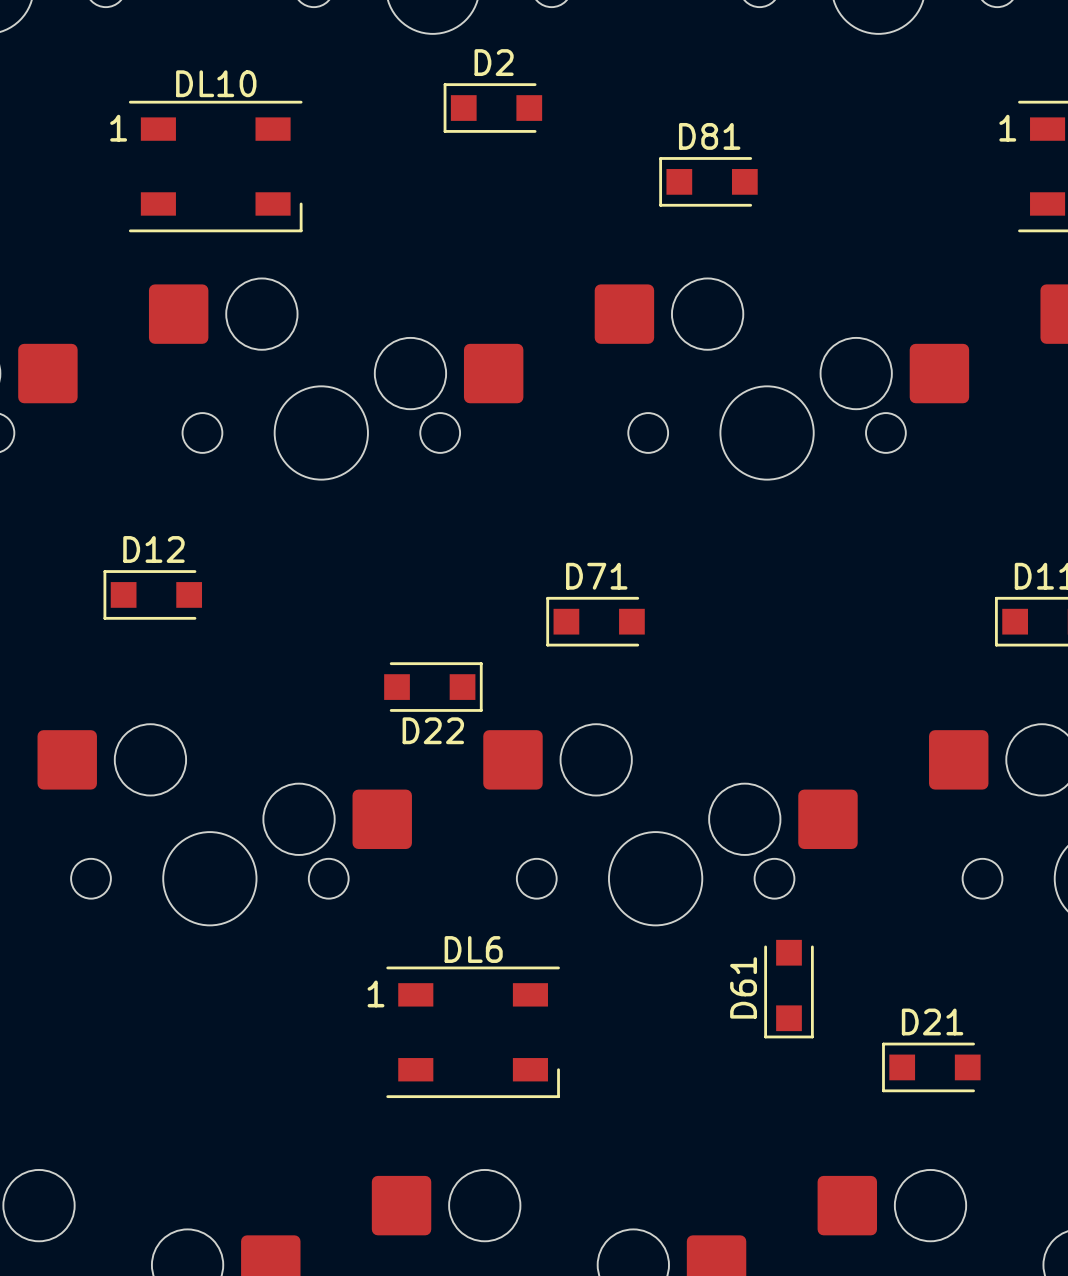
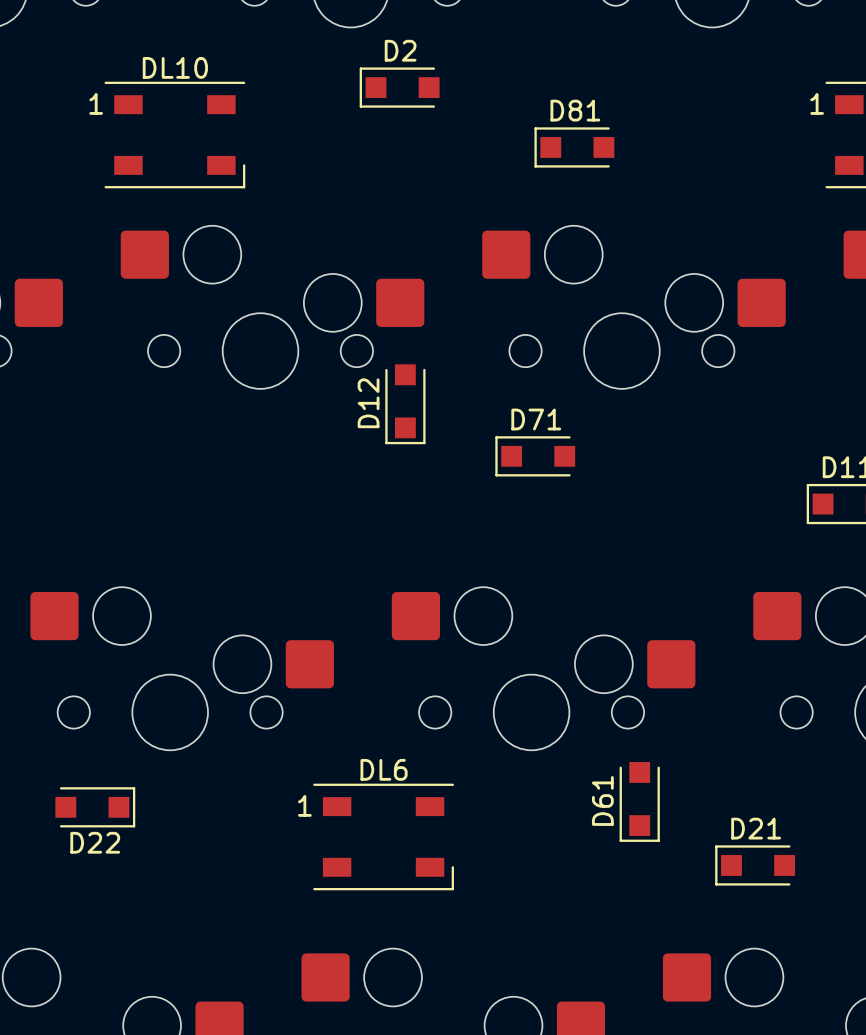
D12 rotation: 0° (152, 594) -> 90° counterclockwise (405, 404)
D12 position: (152, 594) -> (405, 404)
D71 position: (595, 621) -> (535, 456)
D22 position: (433, 687) -> (95, 807)

